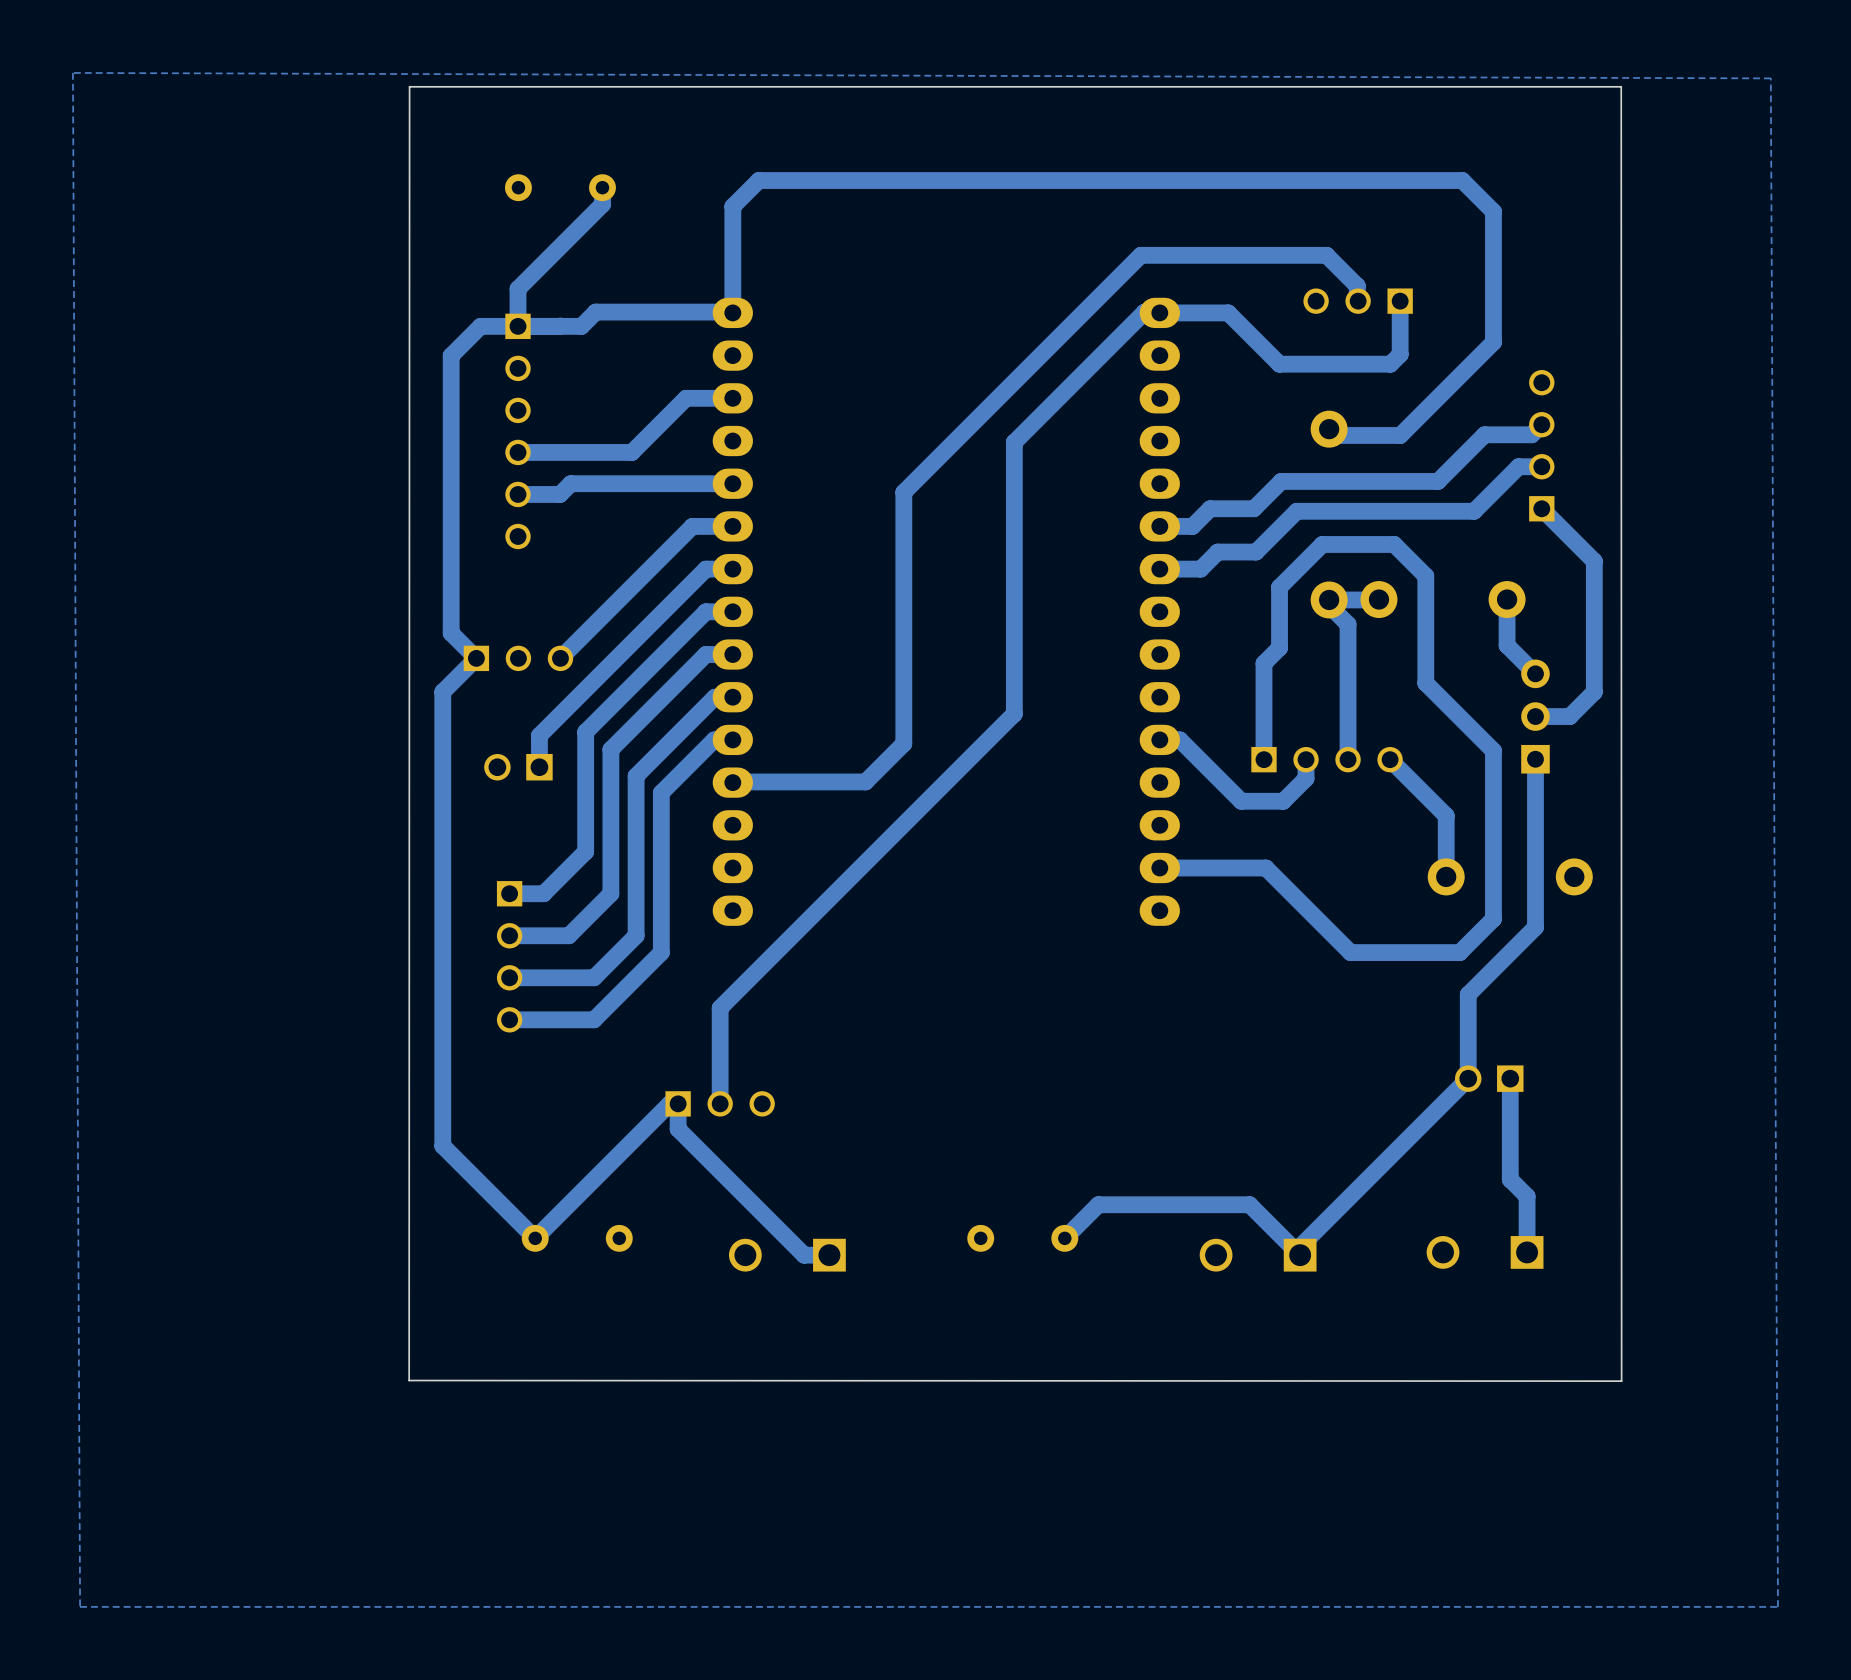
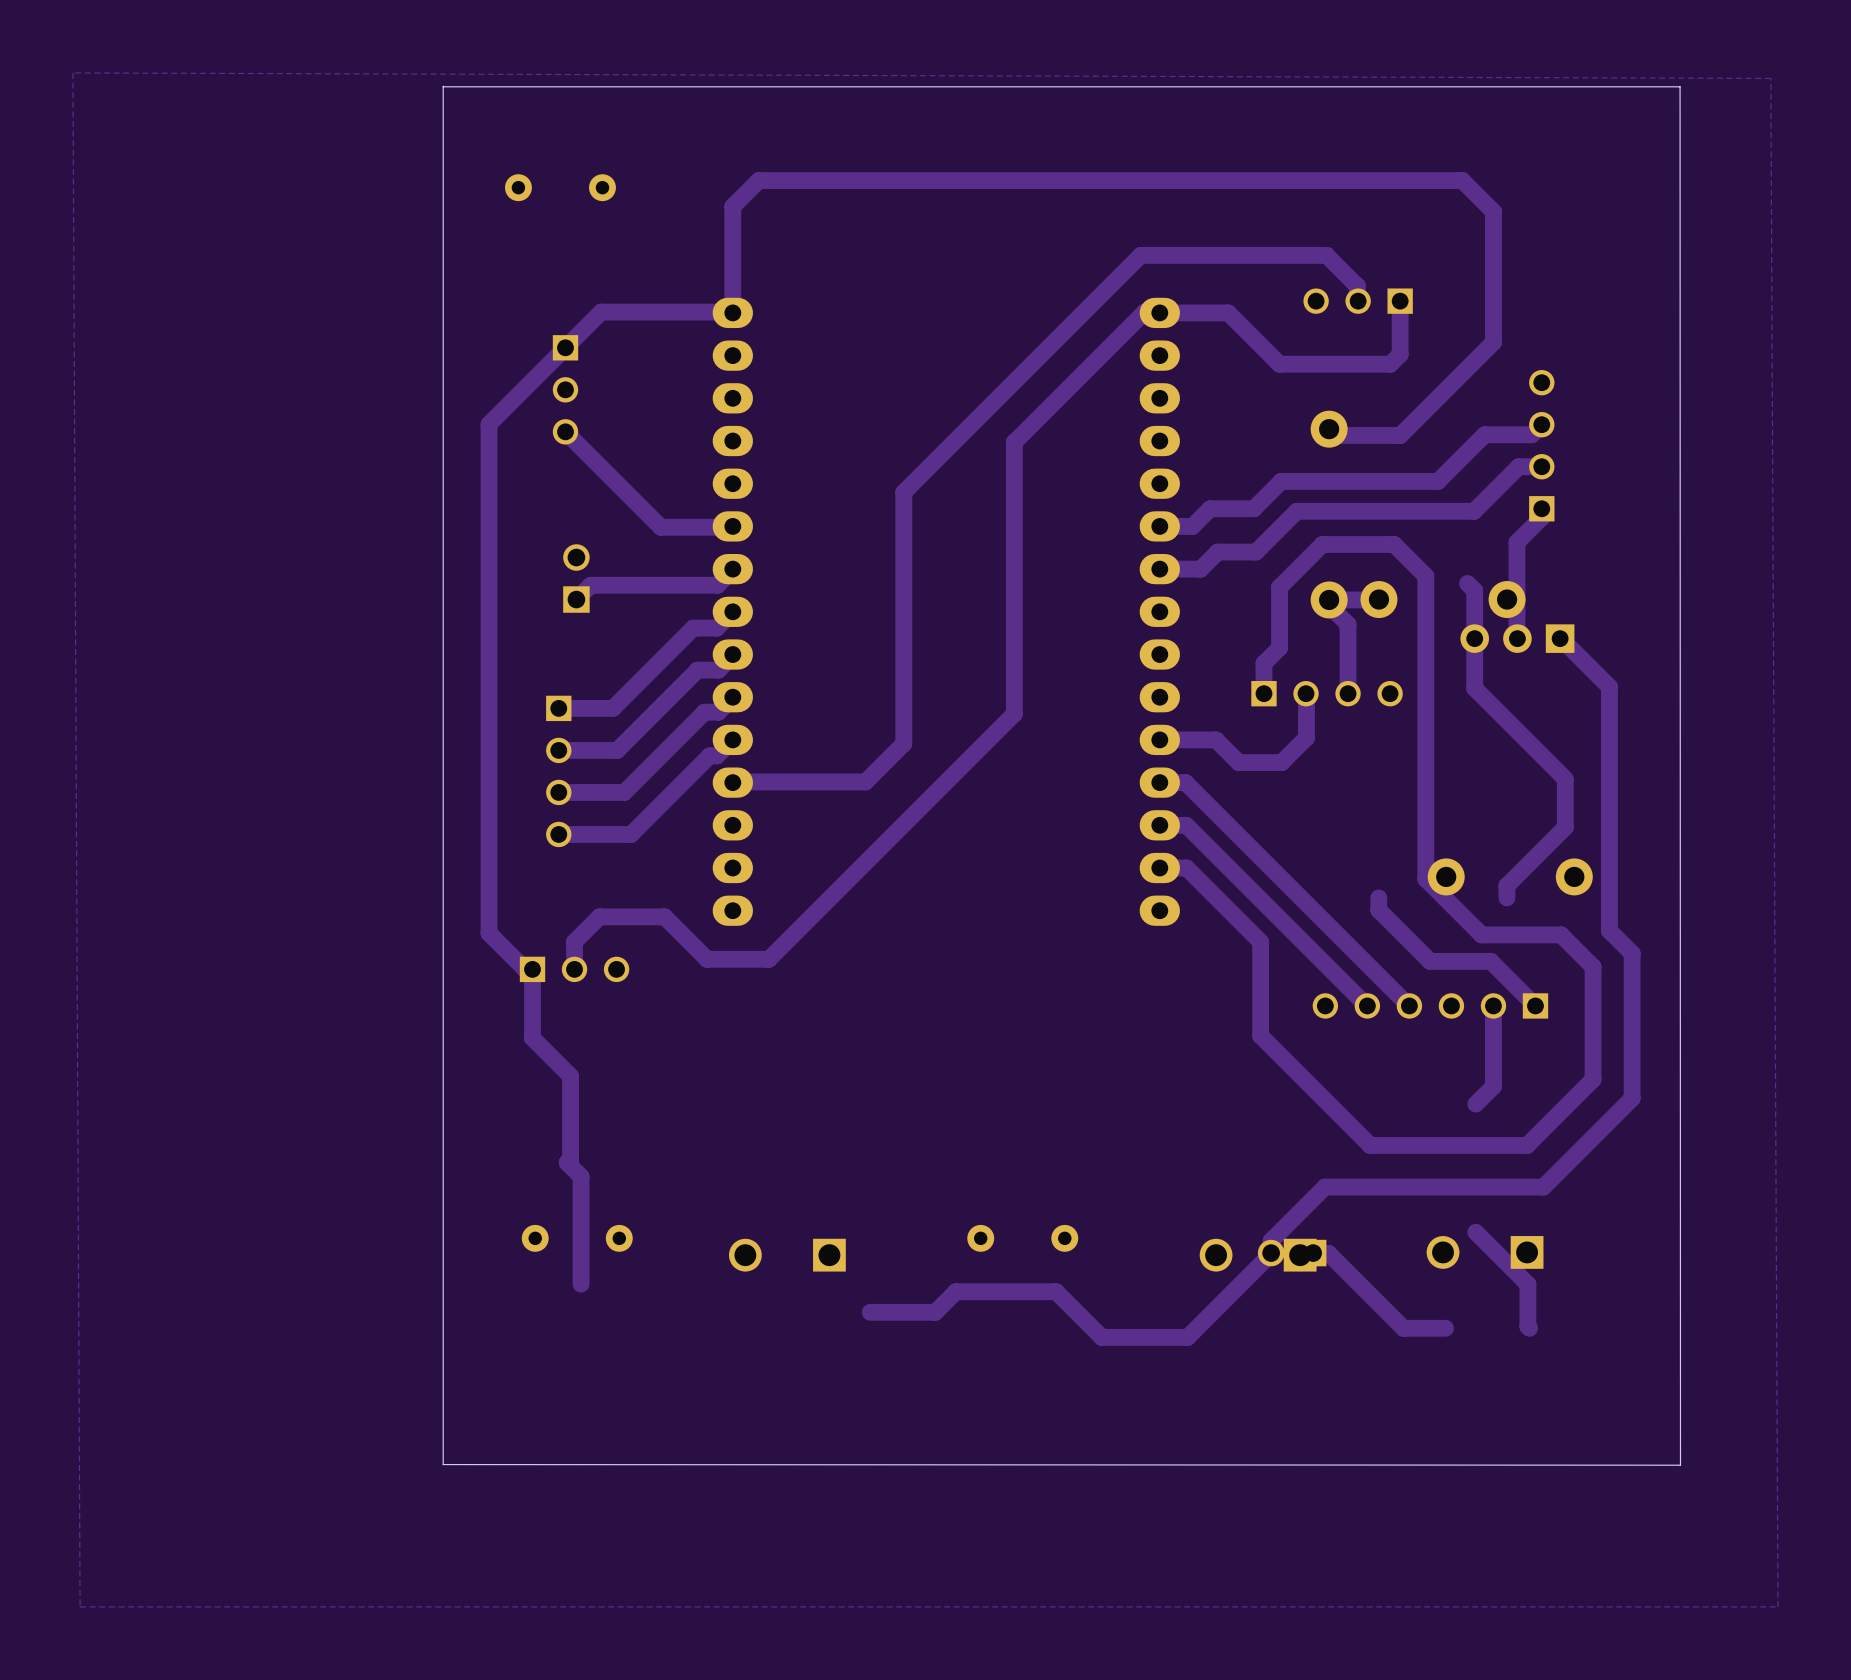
board edge: (1621, 86) (1621, 1381) (409, 1380) (409, 86) (443, 86) -> (1621, 86) (1680, 86) (1680, 1465) (443, 1464) (443, 86)
track: (602, 187) (602, 204) (518, 288) (518, 326) -> none
track: (601, 312) (595, 312) (581, 326) (480, 326) (451, 355) (451, 633) (476, 658) (442, 692) (442, 1145) (535, 1238) (669, 1103) (678, 1103) (678, 1129) (804, 1255) (829, 1255) -> (601, 312) (489, 424) (489, 933) (525, 969) (532, 969) (532, 1038) (570, 1076) (570, 1159) (567, 1162) (581, 1176) (581, 1284)
part: none -> (565, 389)
track: (732, 398) (686, 398) (631, 452) (518, 452) -> none
part: (518, 431) -> none
track: none -> (565, 431) (660, 527) (733, 527)
track: (732, 483) (570, 483) (560, 494) (518, 494) -> none
track: (1541, 508) (1594, 561) (1594, 692) (1569, 716) (1535, 716) -> (1541, 508) (1541, 517) (1517, 542) (1517, 638)
track: (732, 526) (692, 526) (560, 658) -> none
track: (732, 569) (705, 569) (539, 735) (539, 767) -> none
track: none -> (733, 569) (717, 585) (590, 585) (576, 599)
track: none -> (1467, 583) (1474, 590) (1474, 688) (1565, 779)
track: (1507, 599) (1507, 645) (1535, 673) -> none
track: (732, 611) (705, 611) (585, 732) (585, 851) (543, 893) (509, 893) -> none
track: none -> (733, 611) (716, 628) (693, 628) (612, 708) (558, 708)
track: none -> (1560, 638) (1609, 686) (1609, 930) (1632, 953) (1632, 1098) (1543, 1187) (1324, 1187) (1271, 1240) (1271, 1253) (1187, 1337) (1101, 1337) (1056, 1291) (955, 1291) (935, 1312) (870, 1312)
track: (732, 654) (705, 654) (610, 749) (610, 893) (568, 935) (509, 935) -> none
track: none -> (733, 655) (718, 670) (697, 670) (617, 750) (558, 750)
part: (518, 658) -> none
track: (1425, 683) (1493, 750) (1493, 918) (1459, 952) (1350, 952) (1266, 868) (1186, 868) -> (1425, 683) (1425, 879) (1481, 934) (1561, 934) (1593, 966) (1593, 1079) (1527, 1145) (1370, 1145) (1260, 1035) (1260, 941) (1186, 868)
track: (1263, 693) (1263, 759) -> none
track: (1348, 693) (1348, 759) -> none
track: (732, 697) (714, 697) (636, 776) (636, 935) (594, 977) (509, 977) -> none
track: none -> (733, 697) (718, 712) (704, 712) (624, 792) (558, 792)
part rotation: 0° (1535, 716) -> 90° counterclockwise (1517, 638)
part position: (1535, 716) -> (1517, 638)
track: (732, 739) (714, 739) (661, 792) (661, 952) (594, 1019) (509, 1019) -> (732, 739) (716, 755) (709, 755) (631, 834) (558, 834)
track: (1179, 739) (1241, 801) (1283, 801) (1306, 778) (1306, 759) -> (1179, 739) (1216, 739) (1238, 762) (1281, 762) (1306, 737) (1306, 693)
part position: (1327, 759) -> (1327, 693)
track: (1390, 759) (1446, 815) (1446, 876) -> none
track: (1535, 759) (1535, 927) (1468, 994) (1468, 1078) (1300, 1246) (1300, 1255) (1249, 1204) (1098, 1204) (1064, 1238) -> none
part rotation: 0° (518, 767) -> 90° clockwise (576, 578)
part position: (518, 767) -> (576, 578)
track: none -> (1565, 780) (1565, 827) (1506, 885) (1506, 897)
track: none -> (1159, 782) (1185, 782) (1409, 1006)
track: none -> (1159, 825) (1186, 825) (1367, 1006)
track: none -> (1378, 897) (1378, 910) (1430, 961) (1490, 961) (1535, 1005)
part position: (509, 956) -> (558, 771)
track: (768, 959) (720, 1008) (720, 1103) -> (768, 959) (707, 959) (664, 916) (599, 916) (574, 941) (574, 969)
part: none -> (574, 969)
part: none -> (1430, 1005)
track: none -> (1493, 1005) (1493, 1086) (1475, 1104)
part position: (1489, 1078) -> (1292, 1253)
track: (1510, 1078) (1510, 1179) (1527, 1196) (1527, 1252) -> none
part: (720, 1103) -> none
track: none -> (1475, 1232) (1527, 1284) (1527, 1326) (1529, 1328)
track: none -> (1313, 1253) (1328, 1253) (1403, 1328) (1445, 1328)

